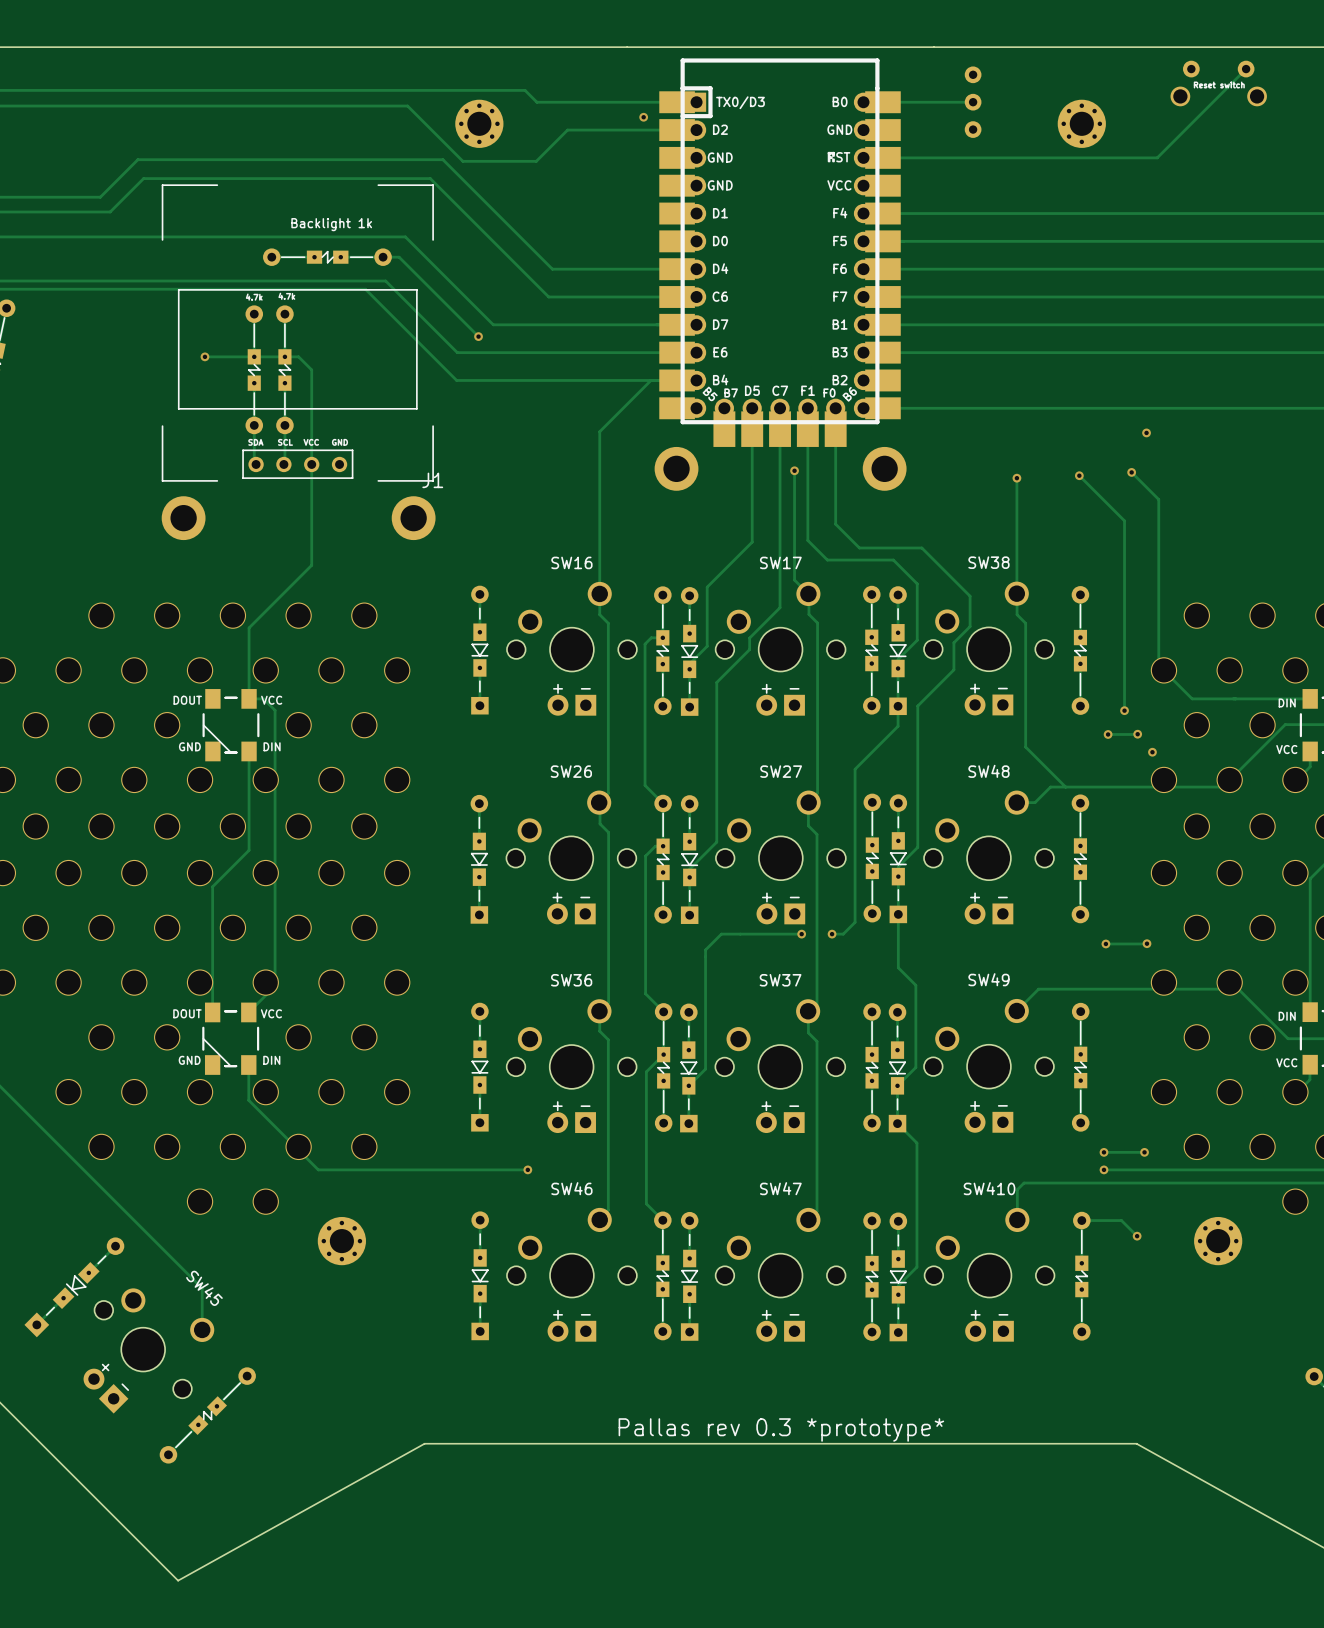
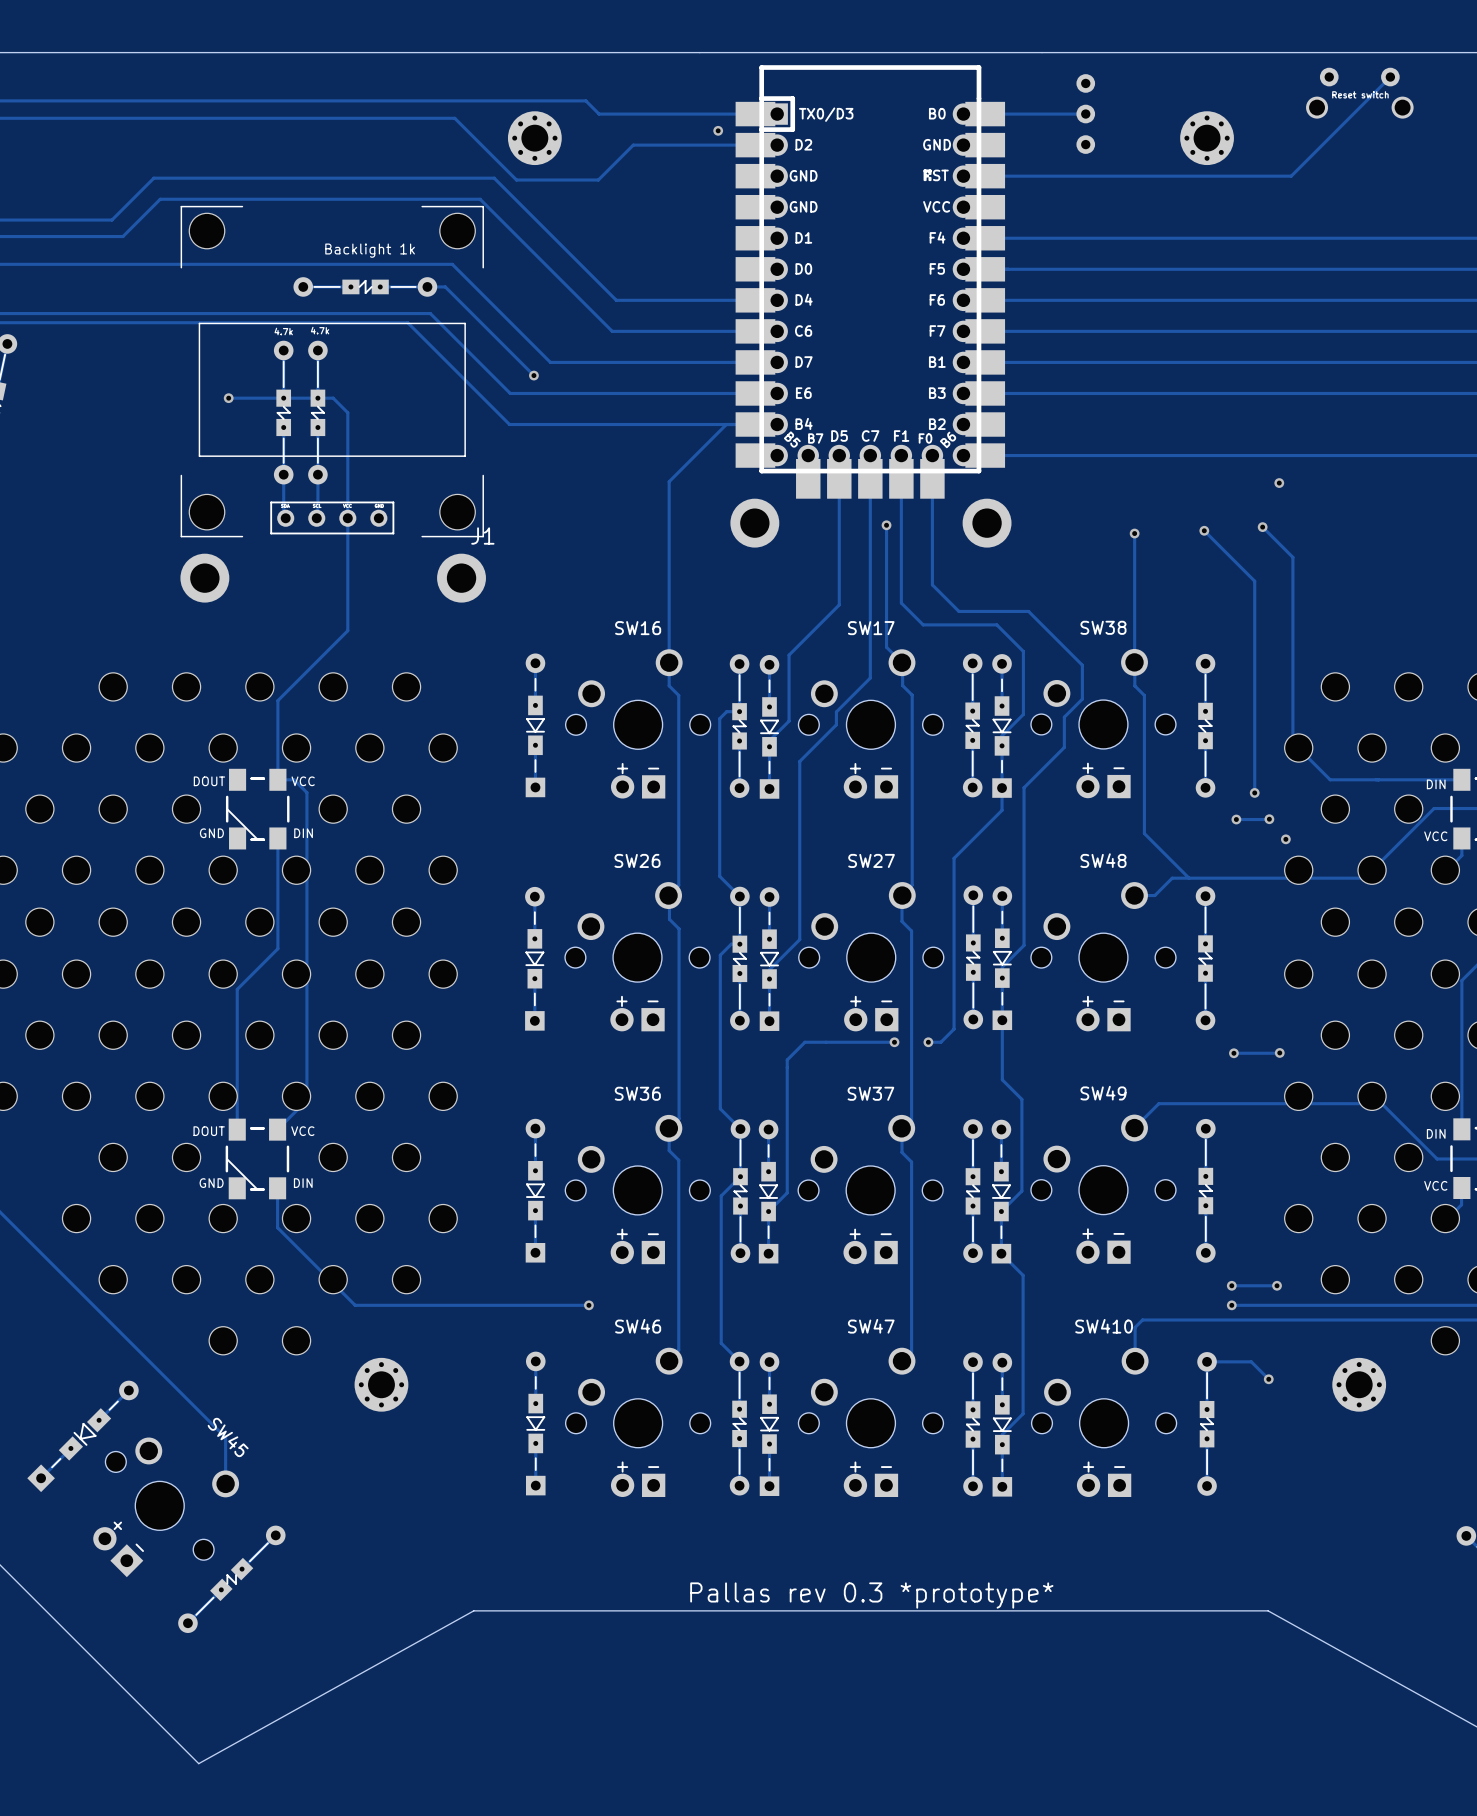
J1 footprint: [161, 184, 434, 482] -> [180, 205, 484, 538]

